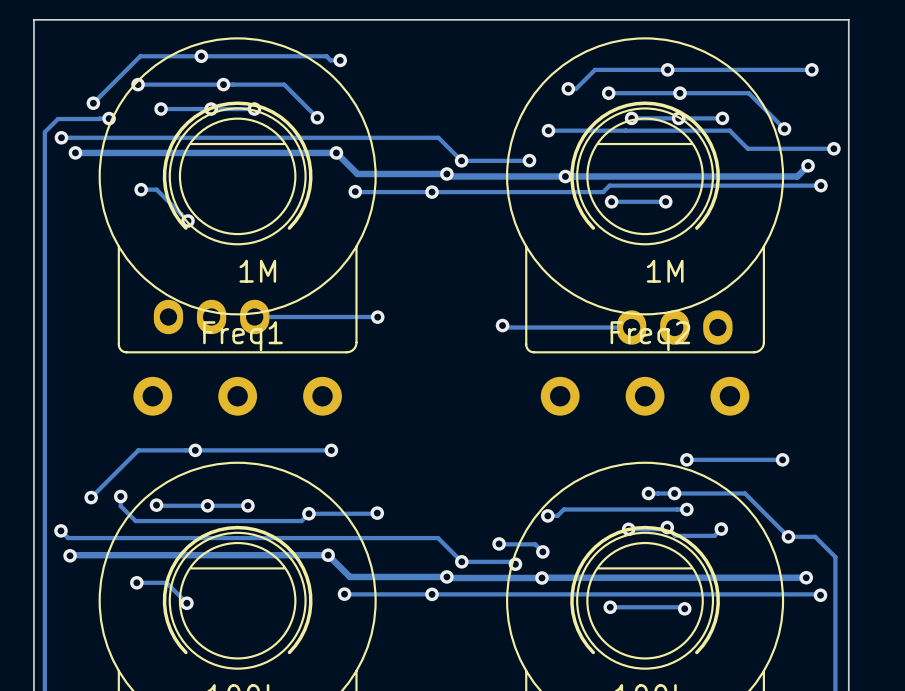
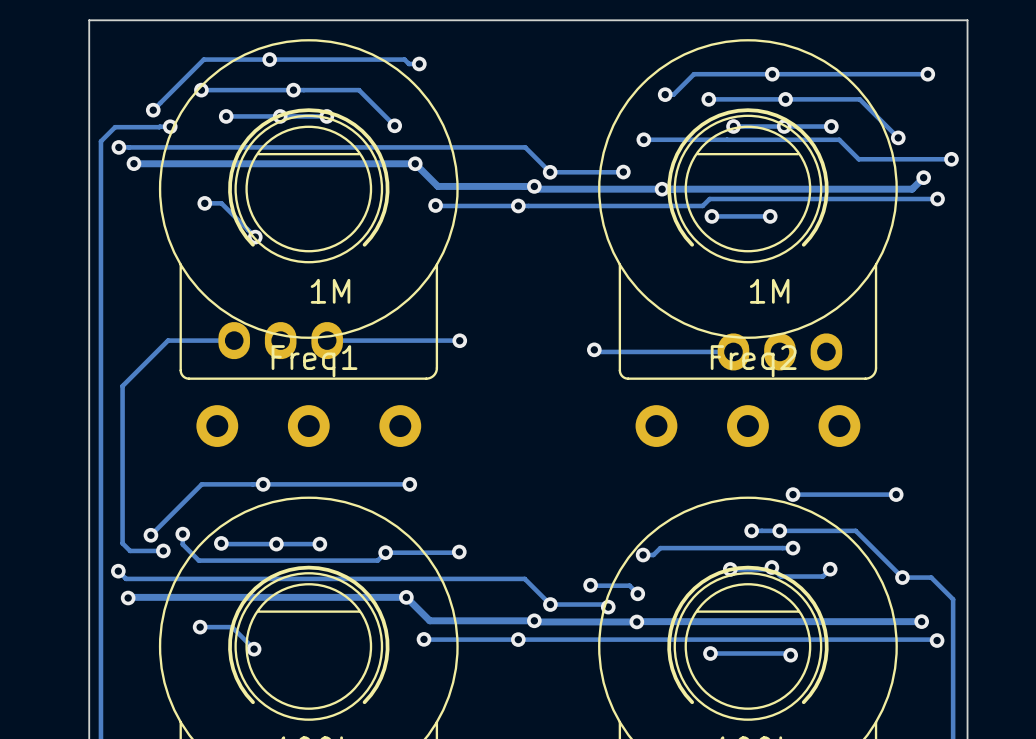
track: none -> (234, 340) (168, 340) (122, 386) (122, 543) (130, 550) (163, 550)
via: none -> (163, 550)

